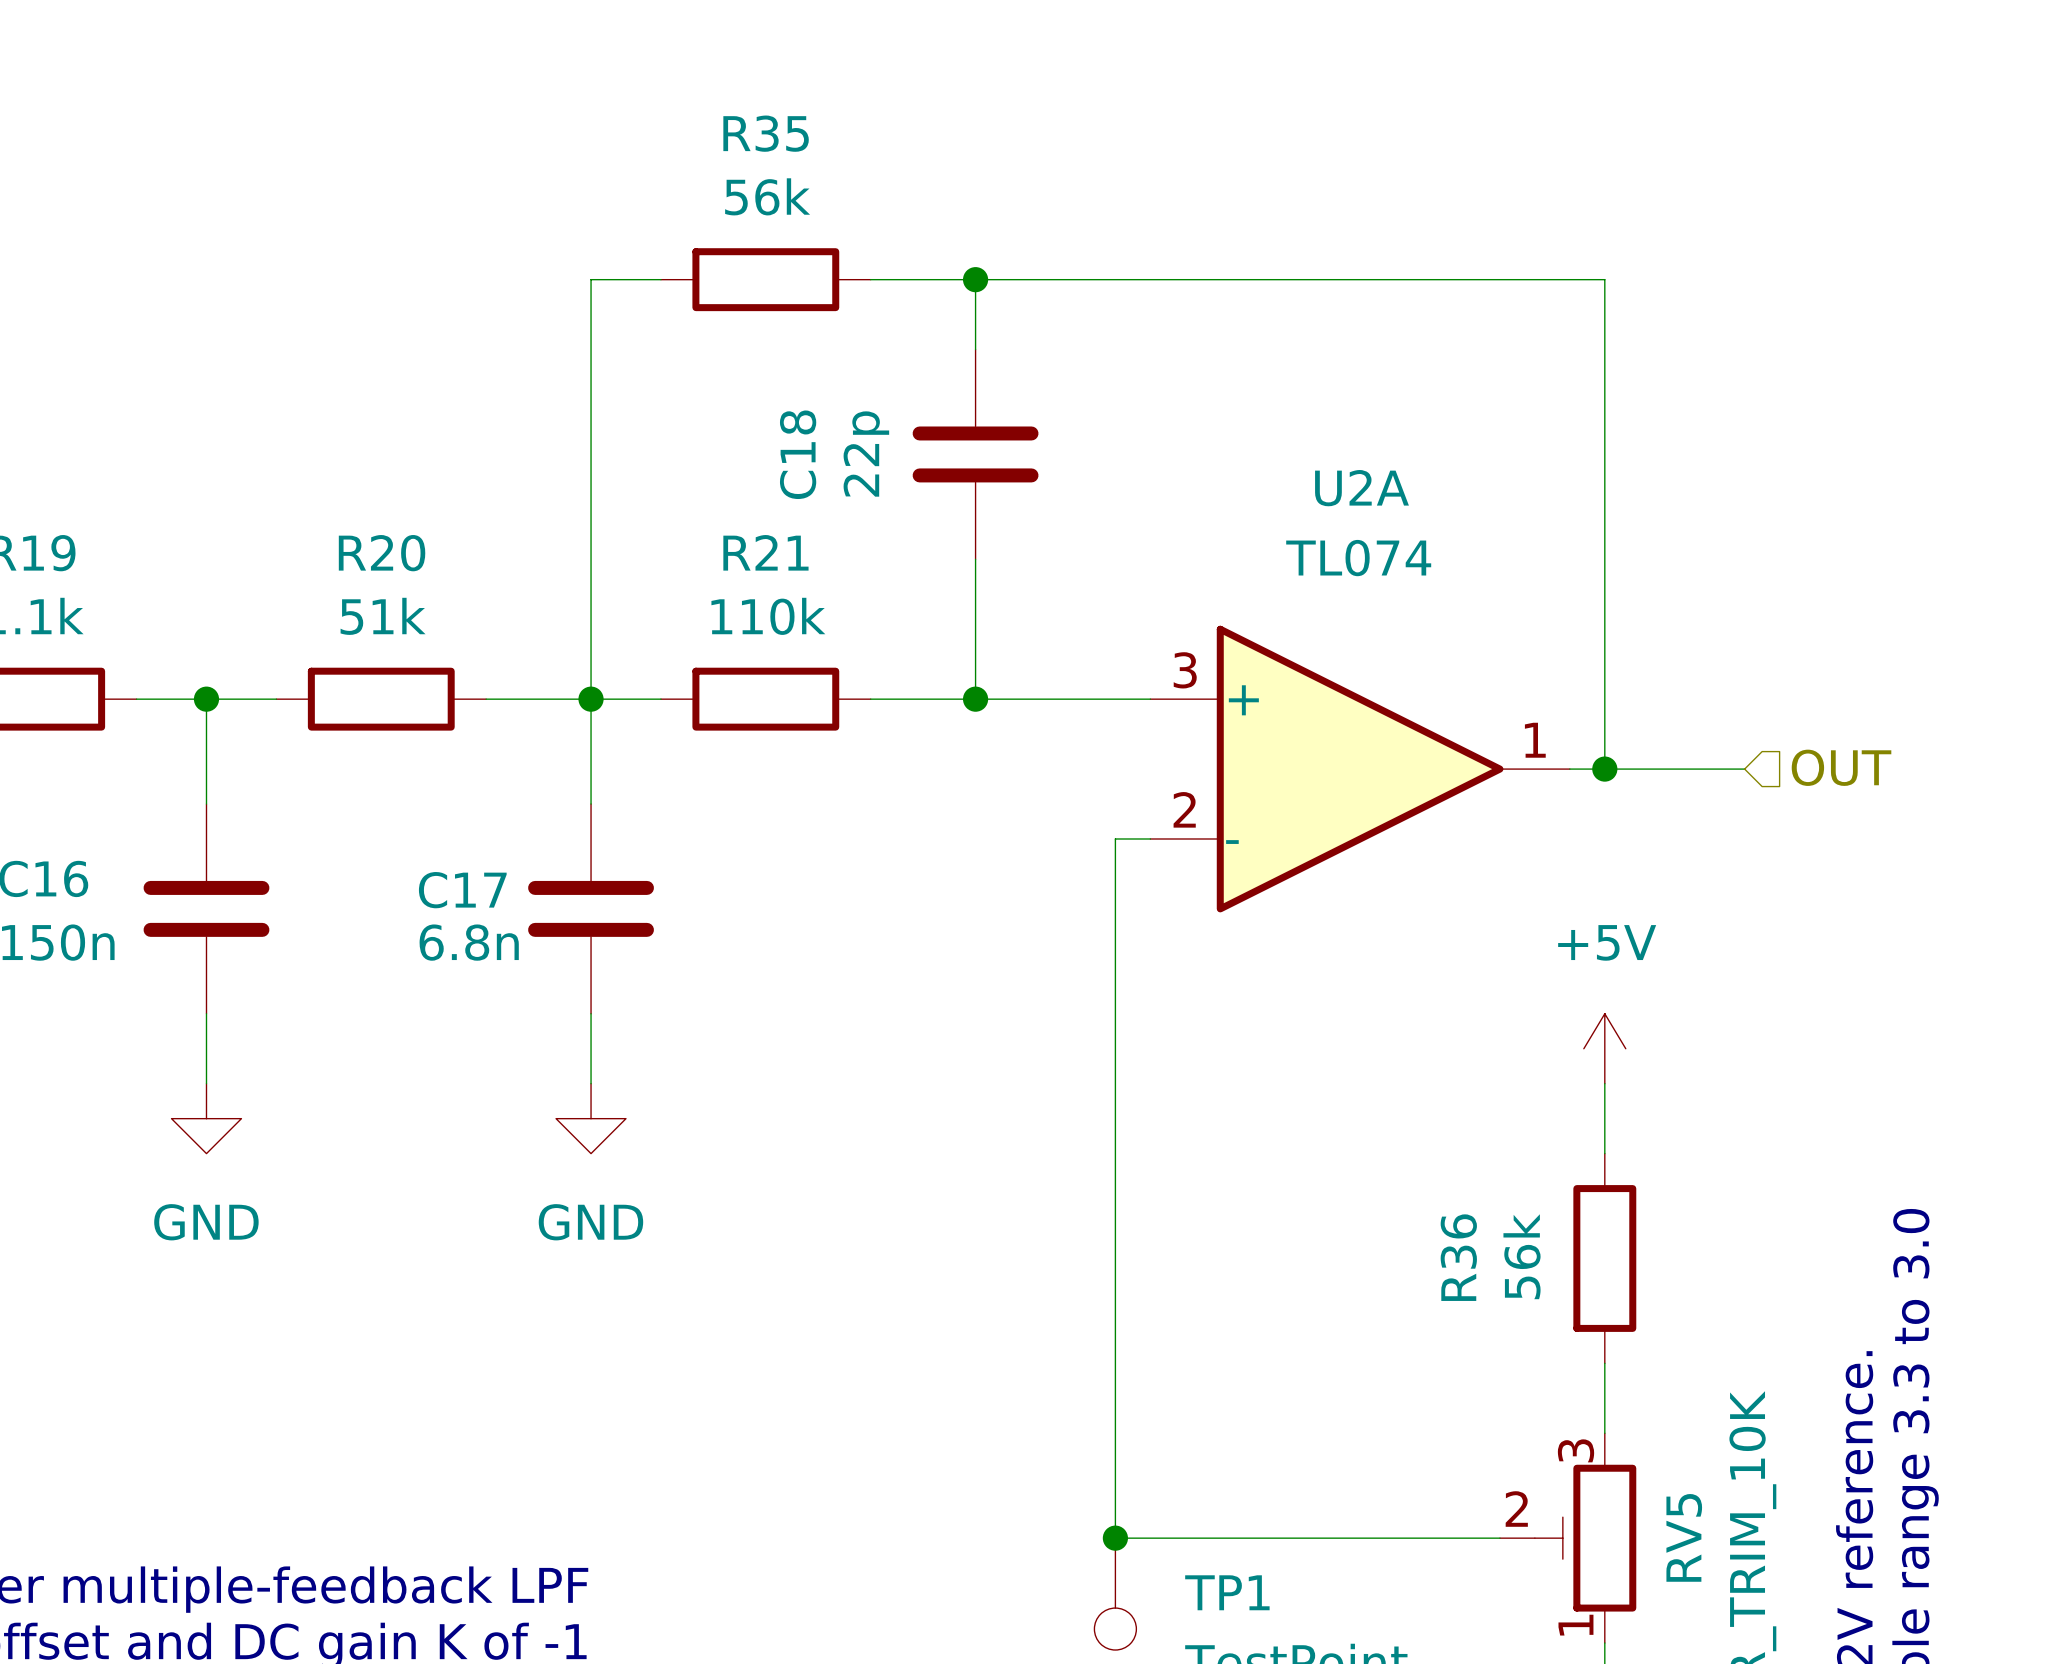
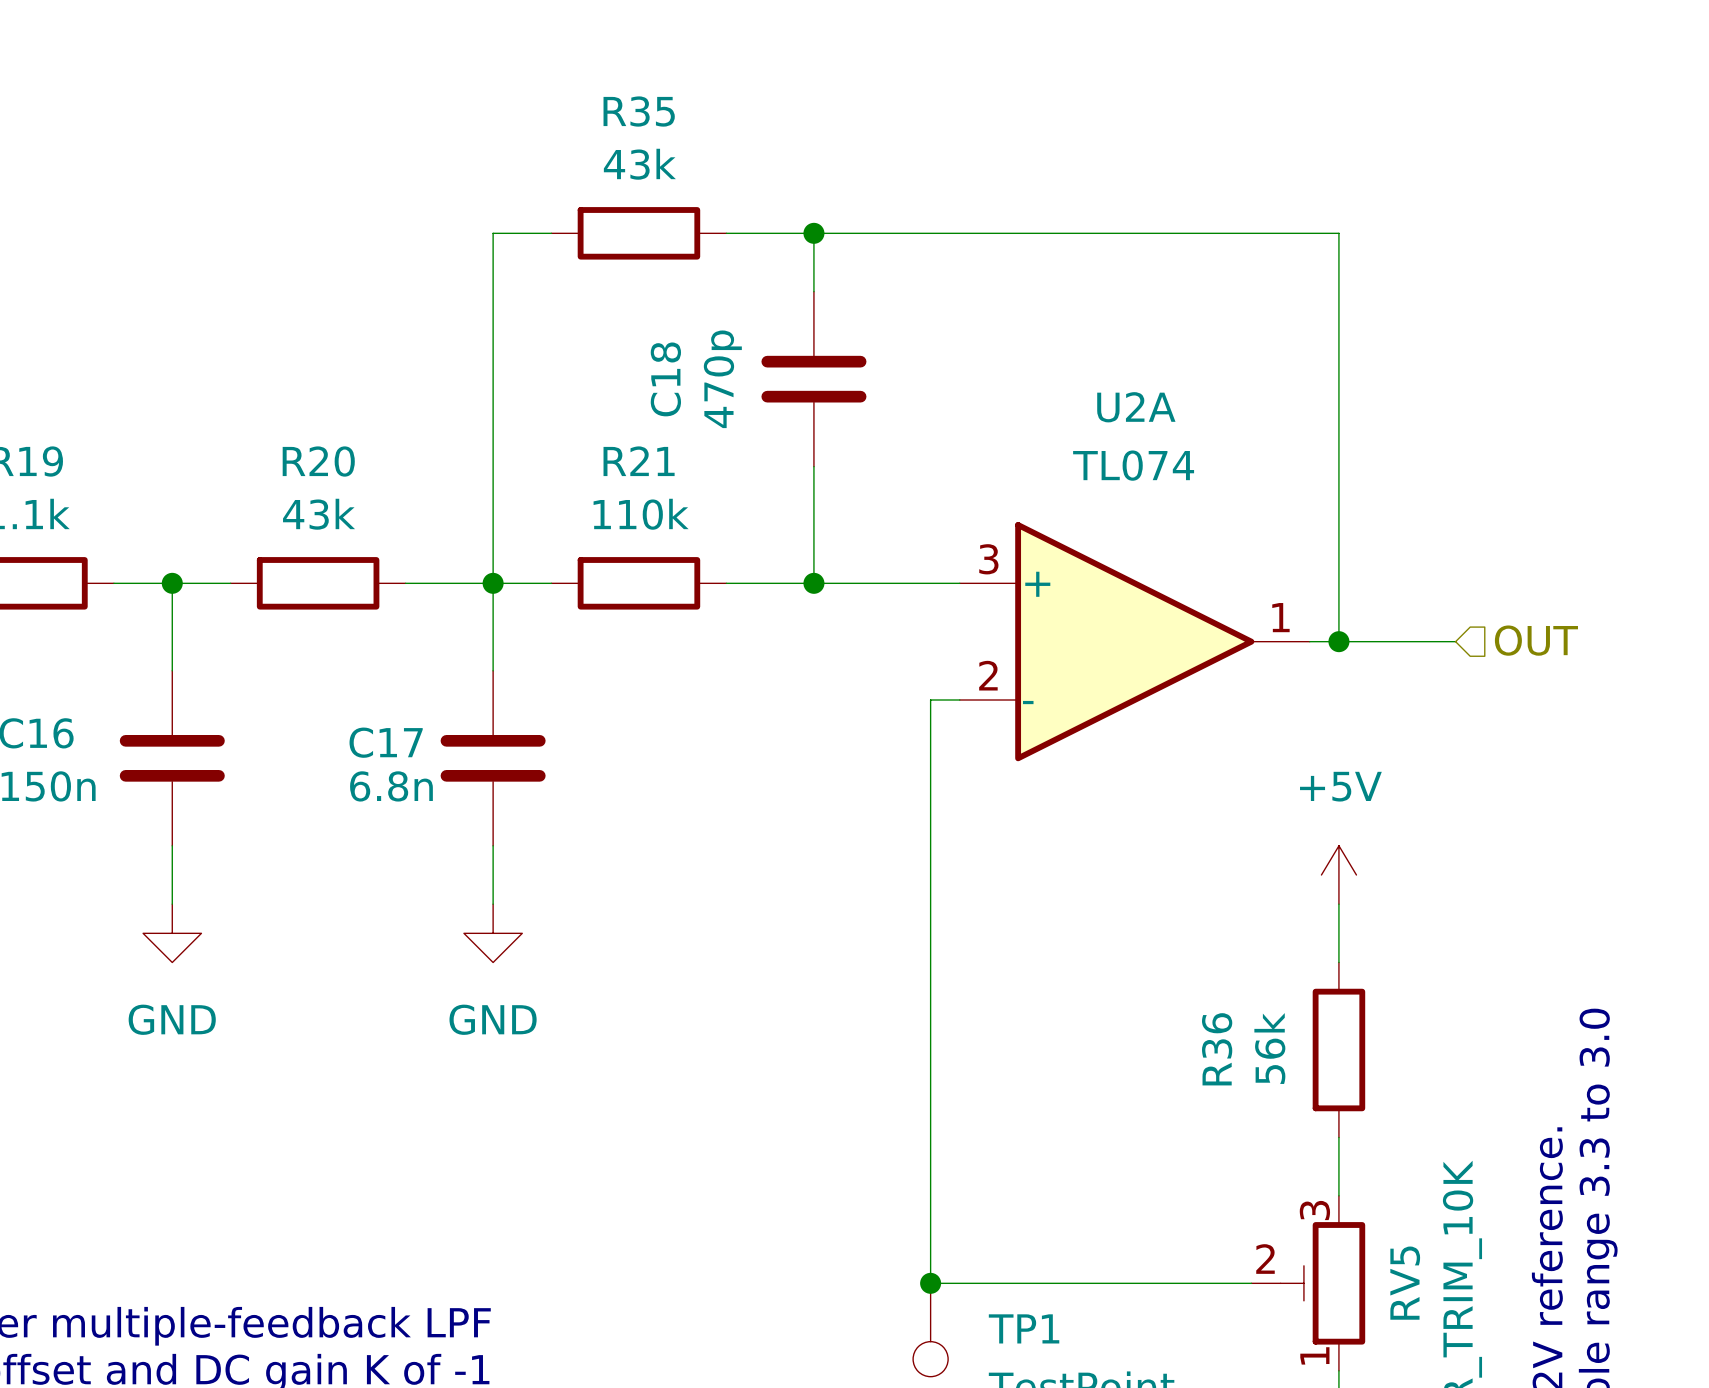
R35 value: 56k (767, 196) -> 43k (639, 164)
C18 value: 22p (866, 454) -> 470p (722, 379)
R20 value: 51k (383, 616) -> 43k (319, 514)

